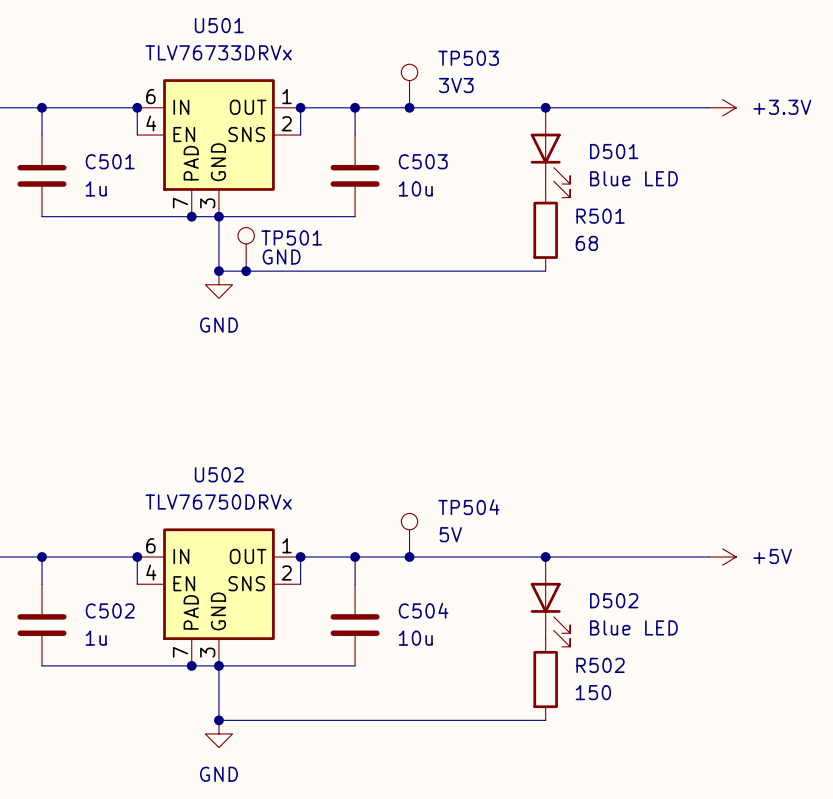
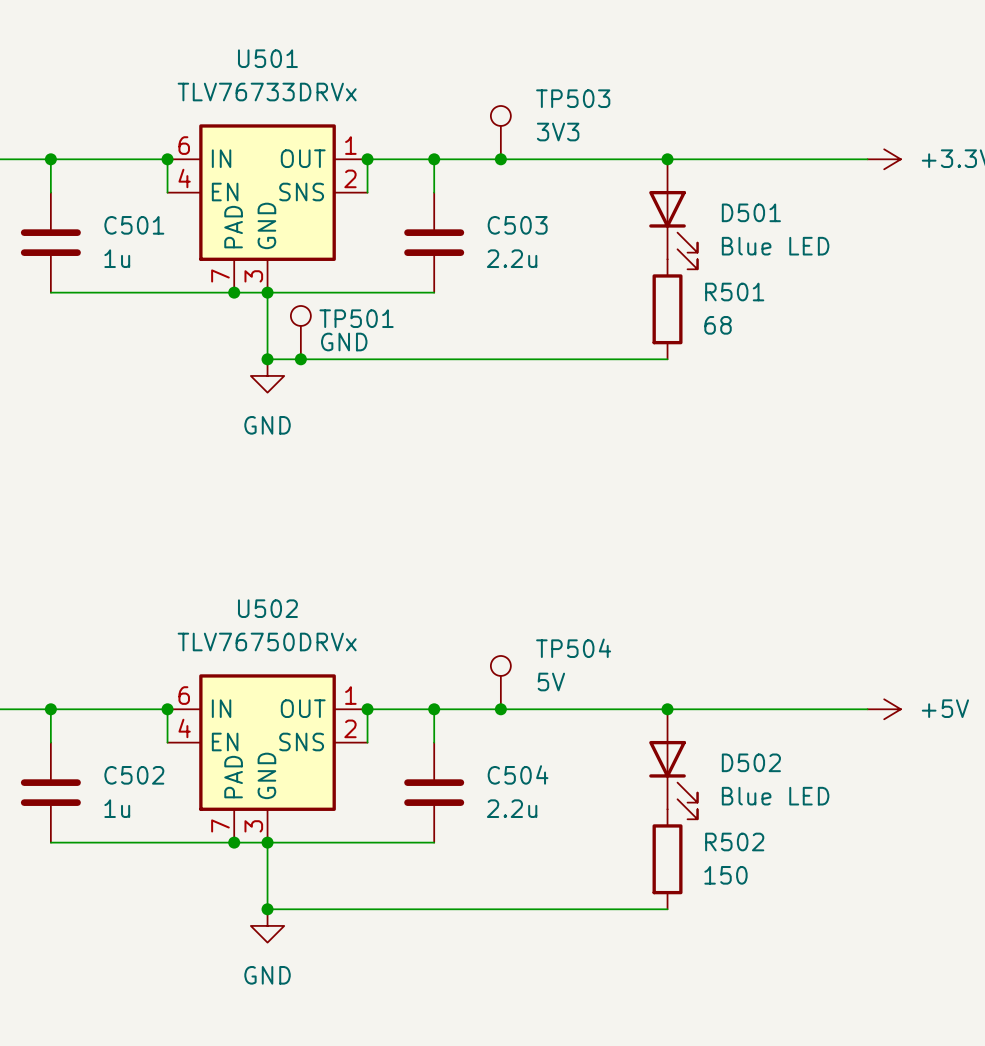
C503 value: 10u (415, 188) -> 2.2u (512, 258)
C504 value: 10u (415, 638) -> 2.2u (512, 808)

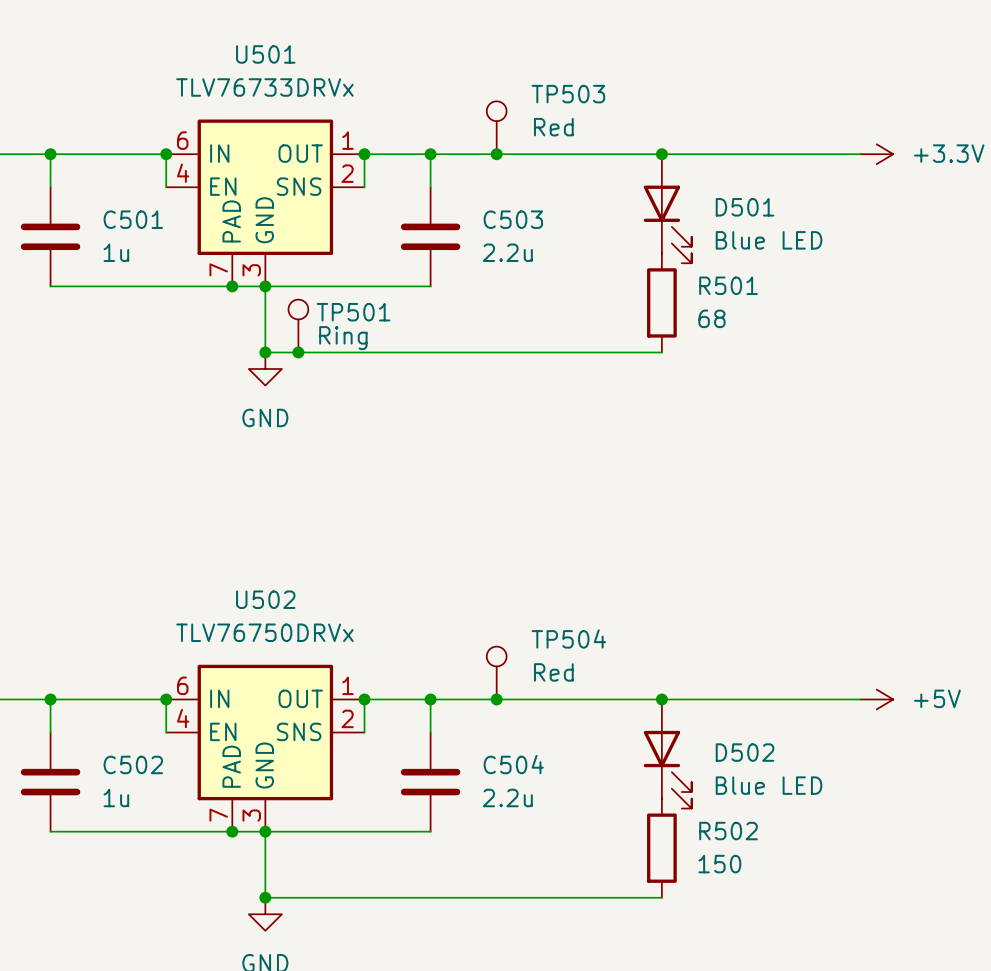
TP503 value: 3V3 (558, 132) -> Red (553, 127)
TP501 value: GND (344, 342) -> Ring (343, 338)
TP504 value: 5V (551, 682) -> Red (553, 672)

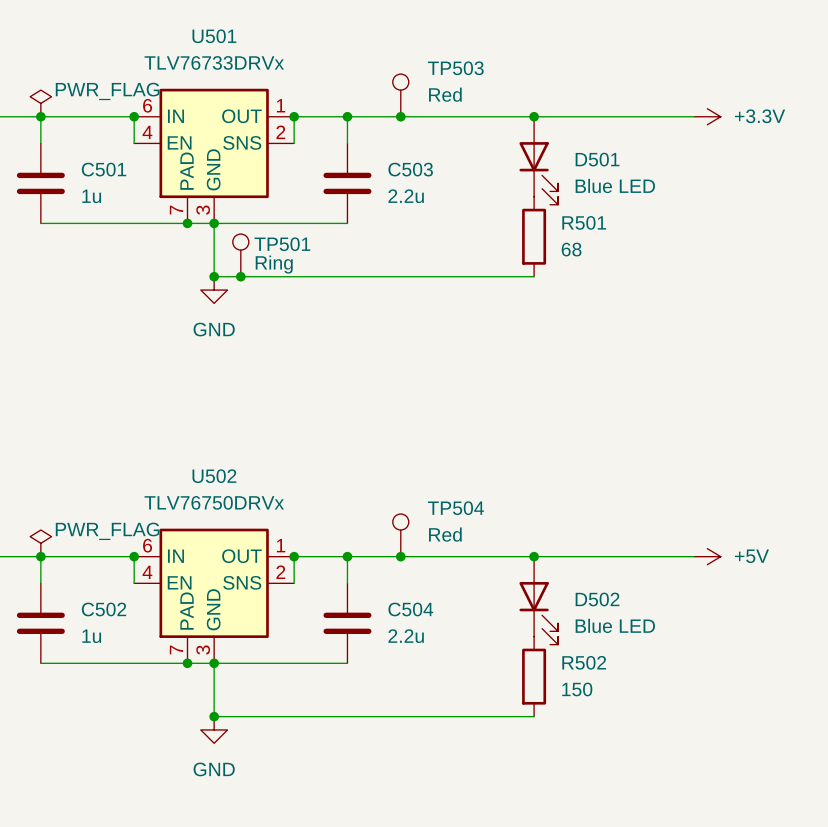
power symbol: none -> PWR_FLAG (40, 103)
power symbol: none -> PWR_FLAG (40, 543)

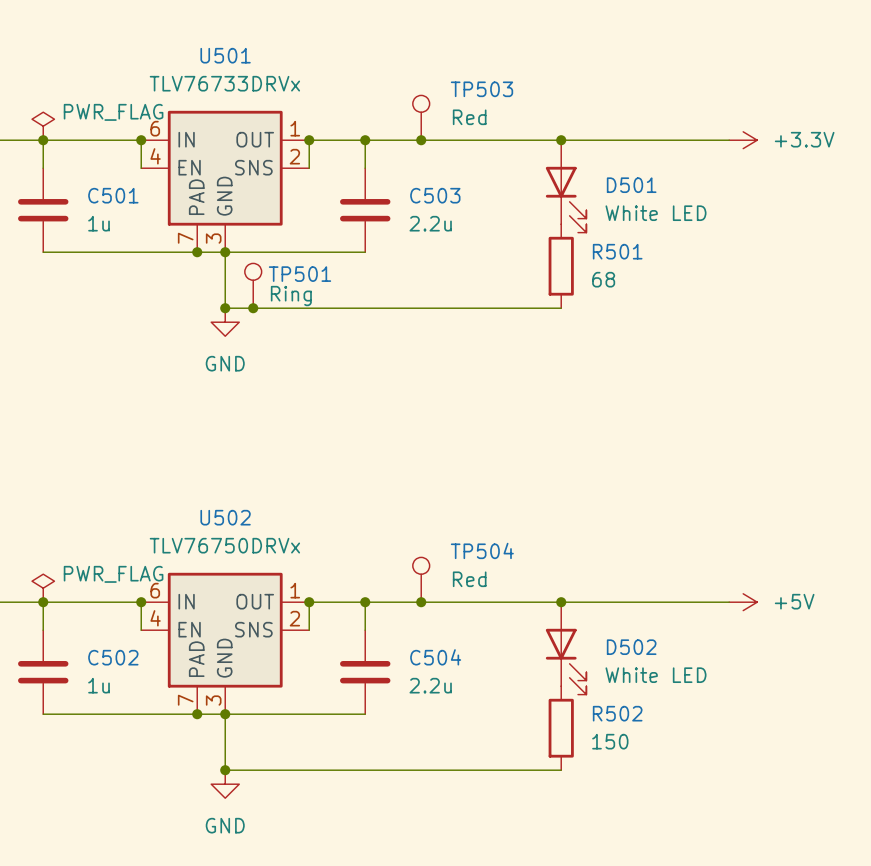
D501 value: Blue LED (615, 185) -> White LED (655, 213)
D502 value: Blue LED (615, 625) -> White LED (655, 675)

